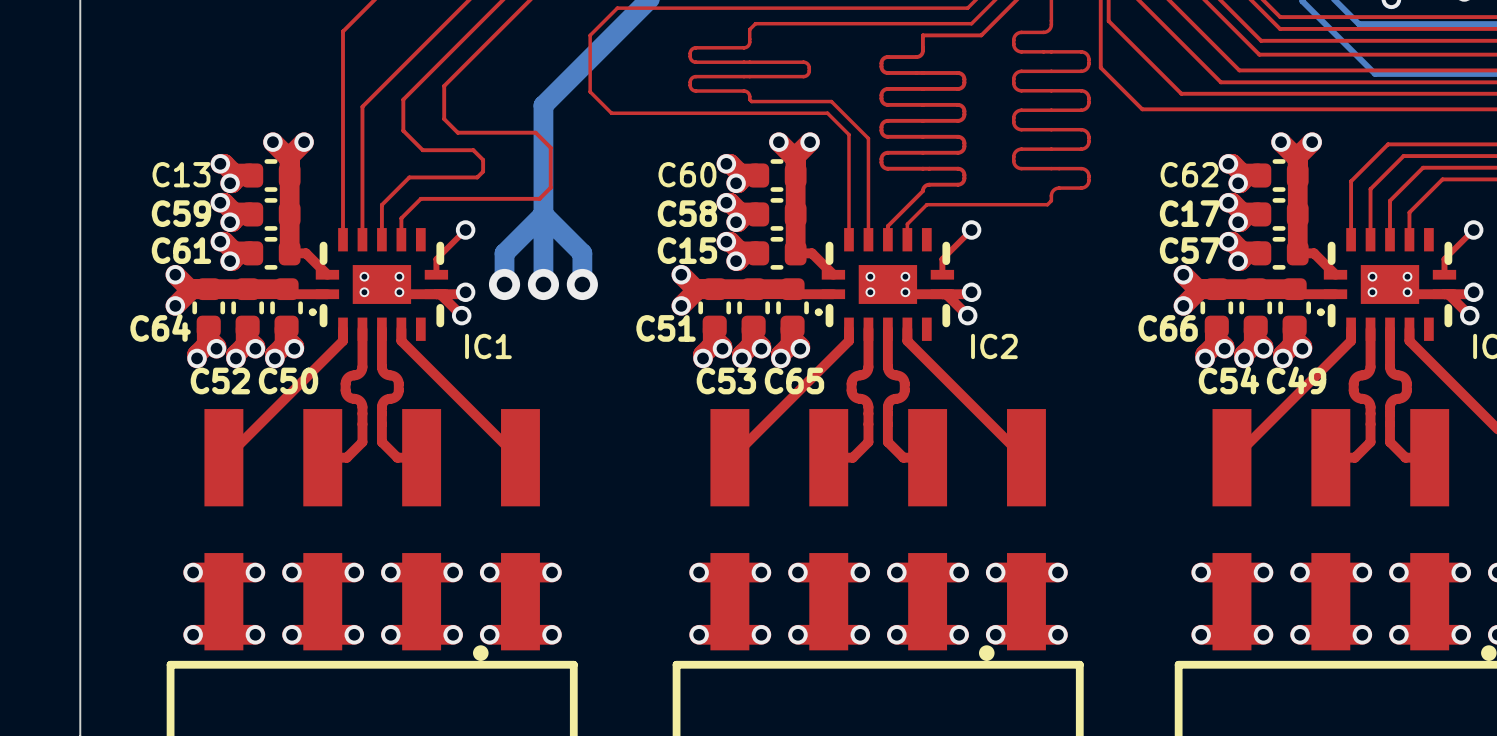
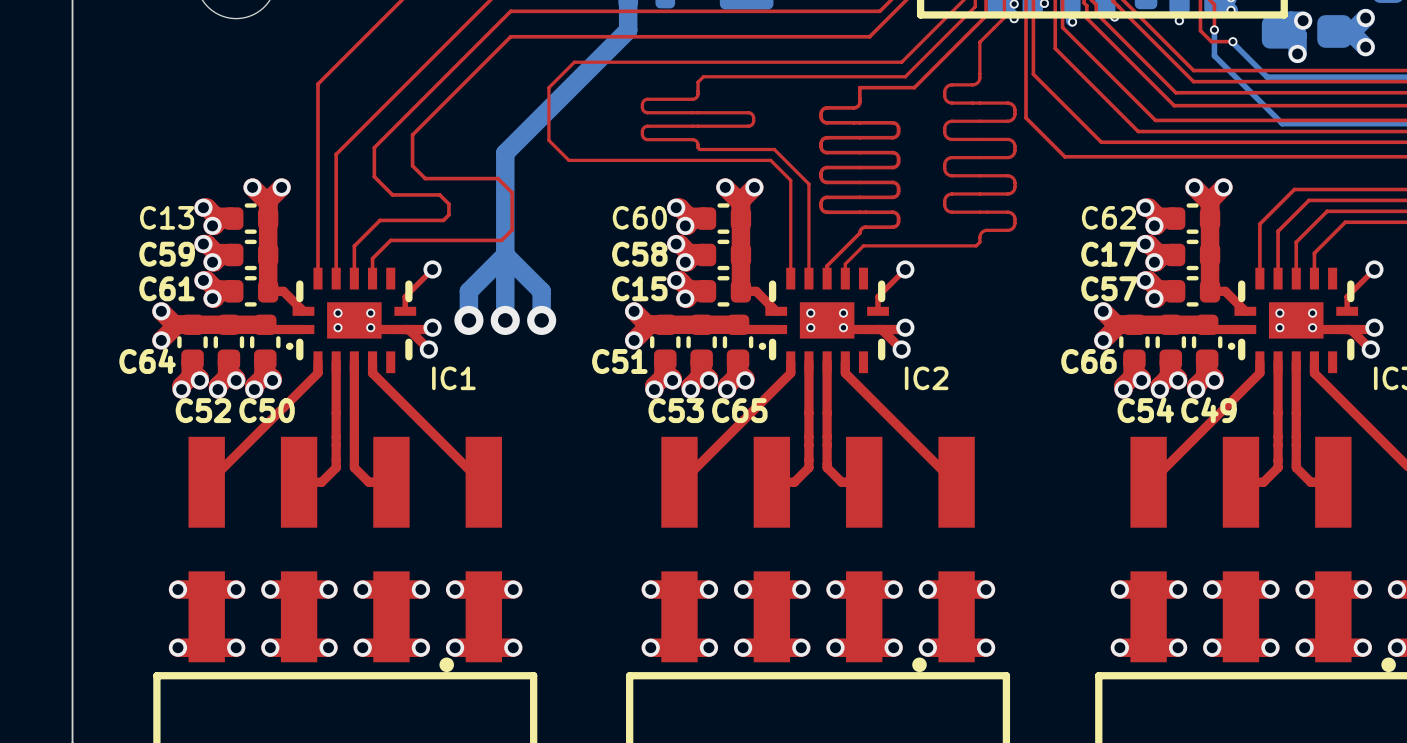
top track: (362, 366) (359, 372) (348, 377) (345, 383) (347, 395) (359, 400) (362, 407) -> (336, 397) (336, 435)
top track: (381, 366) (385, 373) (396, 377) (398, 383) (396, 395) (385, 400) (381, 407) -> (354, 397) (354, 435)
top track: (868, 366) (865, 372) (854, 377) (851, 383) (853, 395) (865, 400) (868, 407) -> (808, 397) (808, 435)
top track: (887, 366) (891, 373) (902, 377) (904, 383) (902, 395) (891, 400) (887, 407) -> (827, 397) (827, 435)
top track: (1370, 366) (1368, 372) (1356, 377) (1353, 383) (1355, 395) (1367, 400) (1370, 407) -> (1278, 397) (1278, 435)
top track: (1389, 366) (1393, 373) (1404, 377) (1406, 383) (1405, 395) (1393, 400) (1389, 407) -> (1296, 397) (1296, 435)

